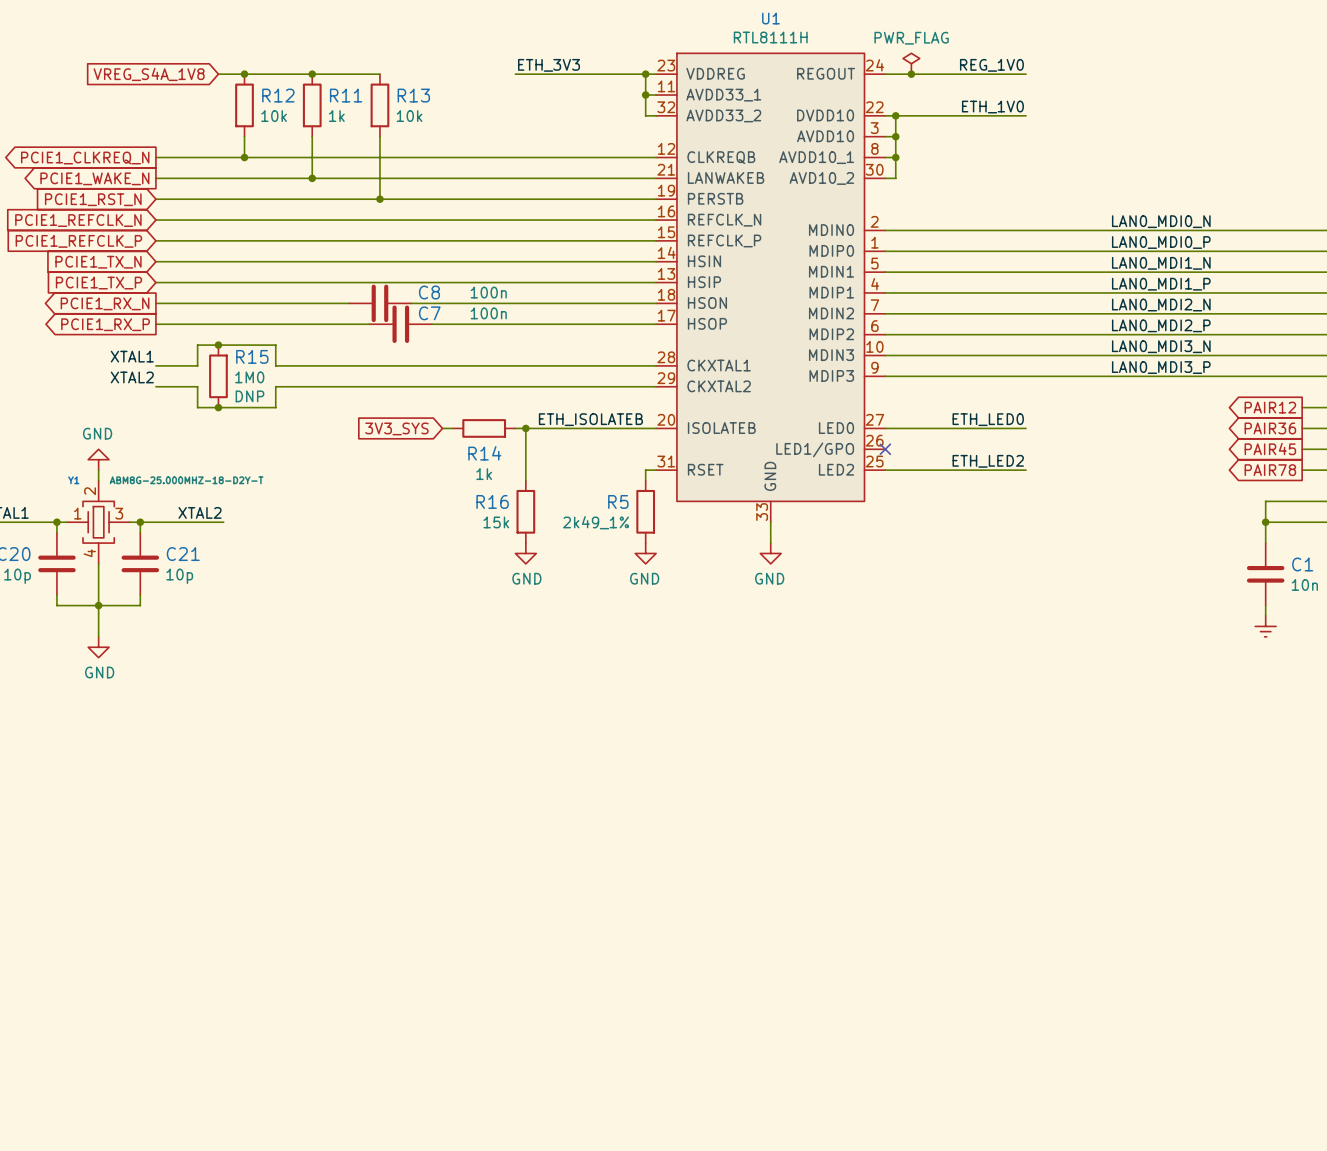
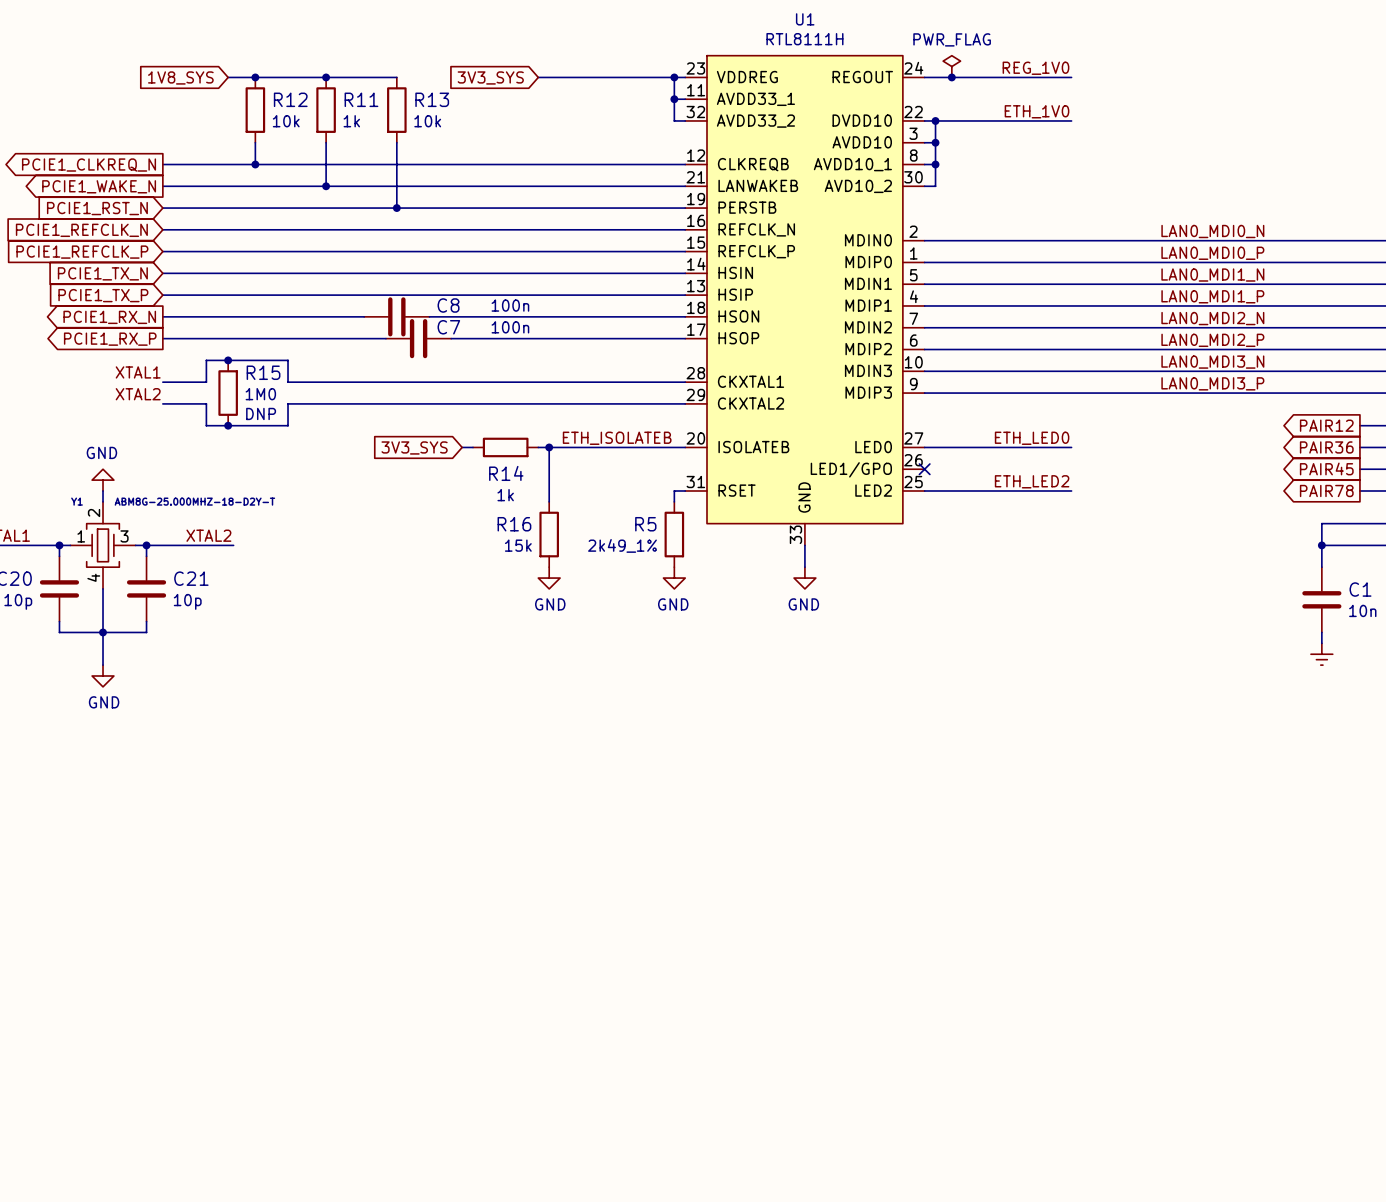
label: ETH_3V3 (549, 65) -> none
global label: VREG_S4A_1V8 (149, 74) -> 1V8_SYS (180, 77)
global label: none -> 3V3_SYS (490, 77)

